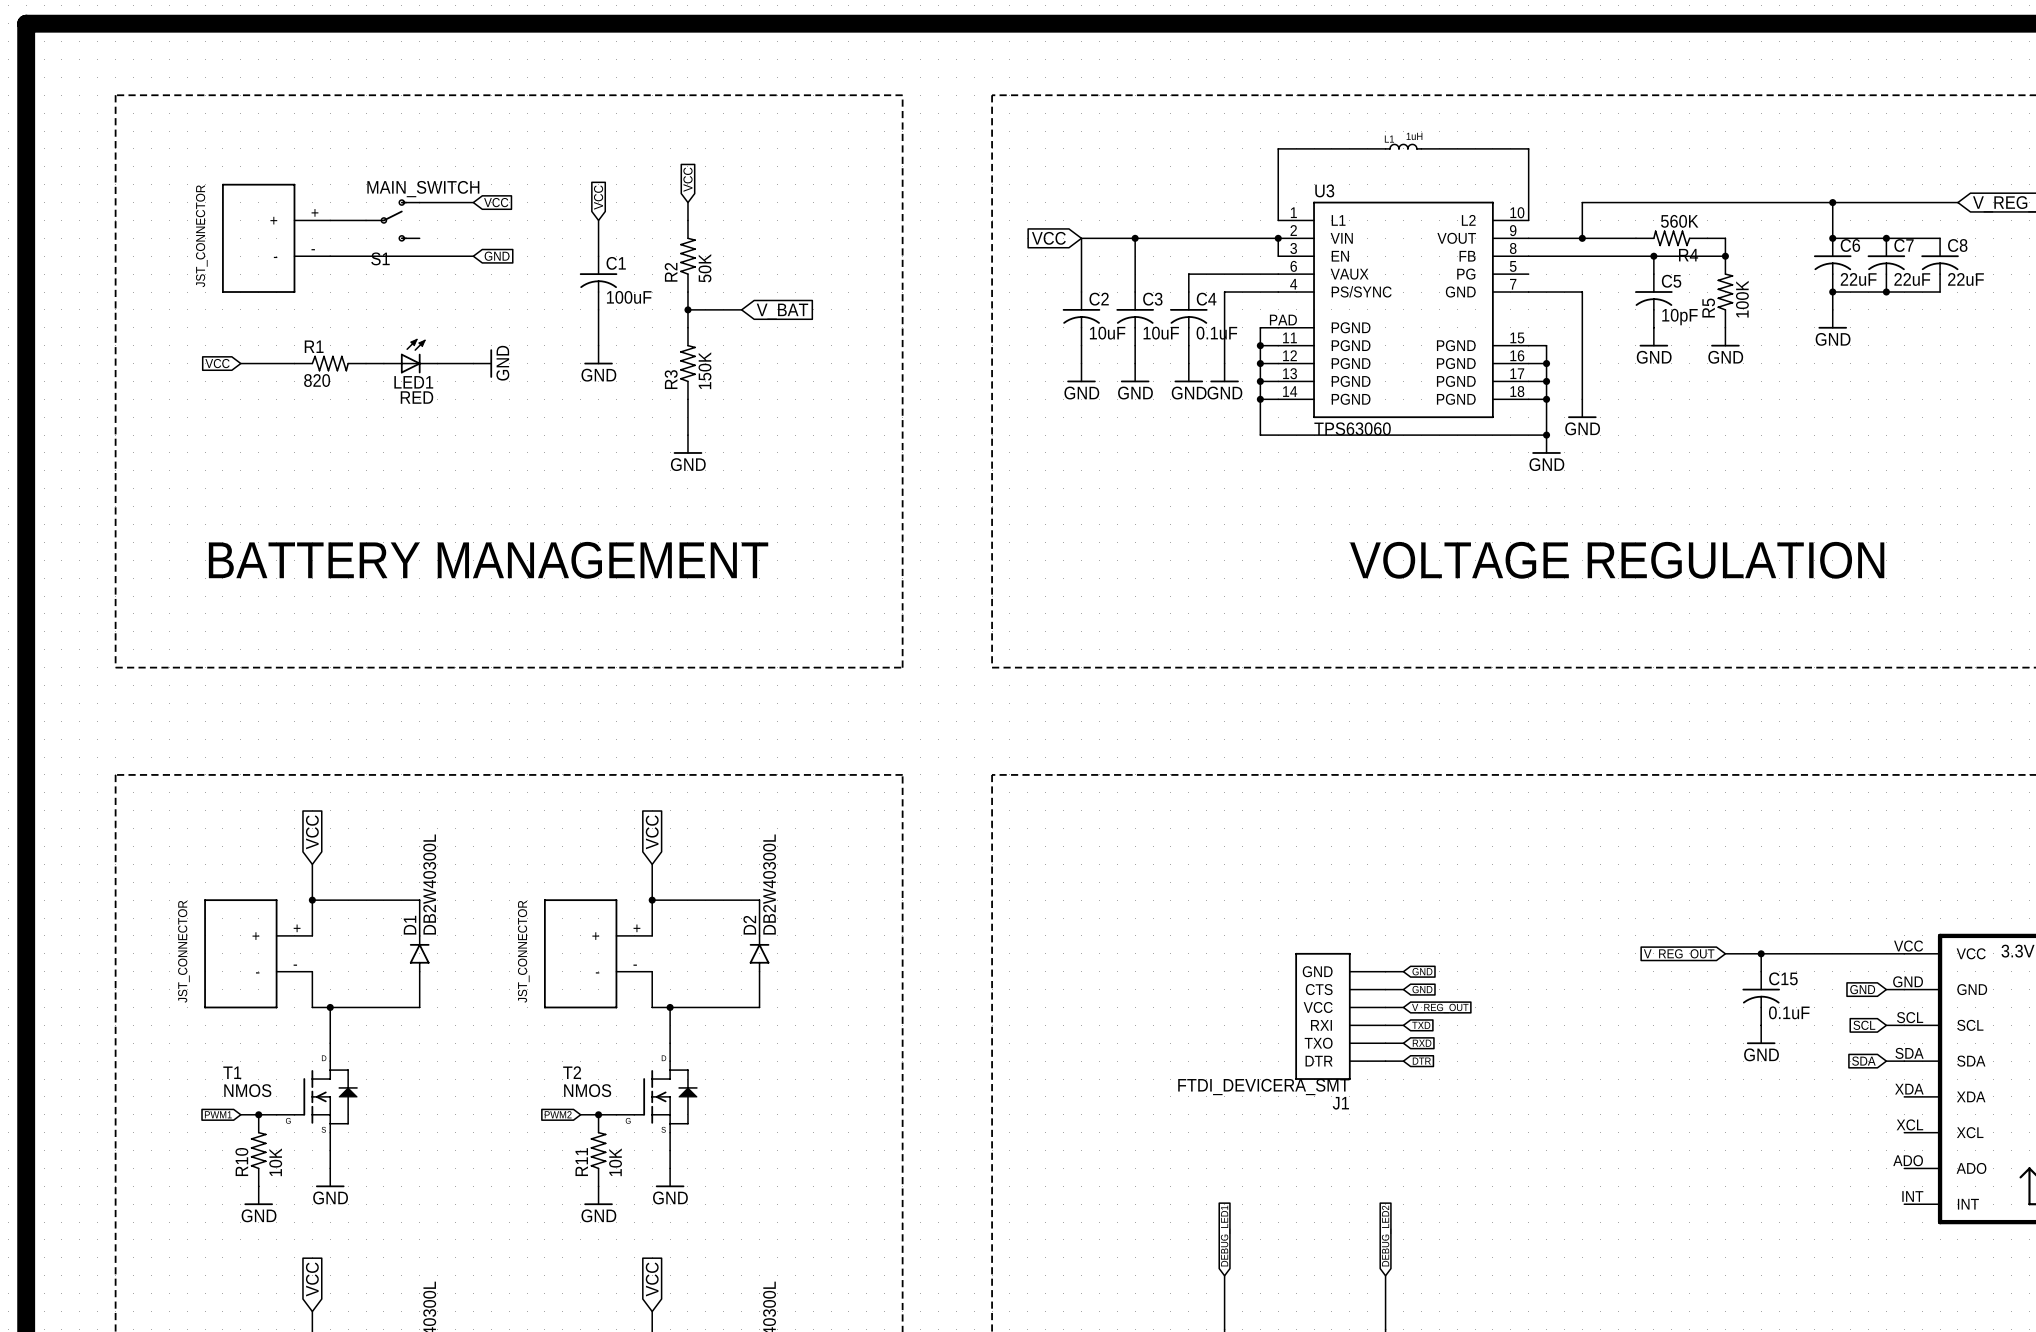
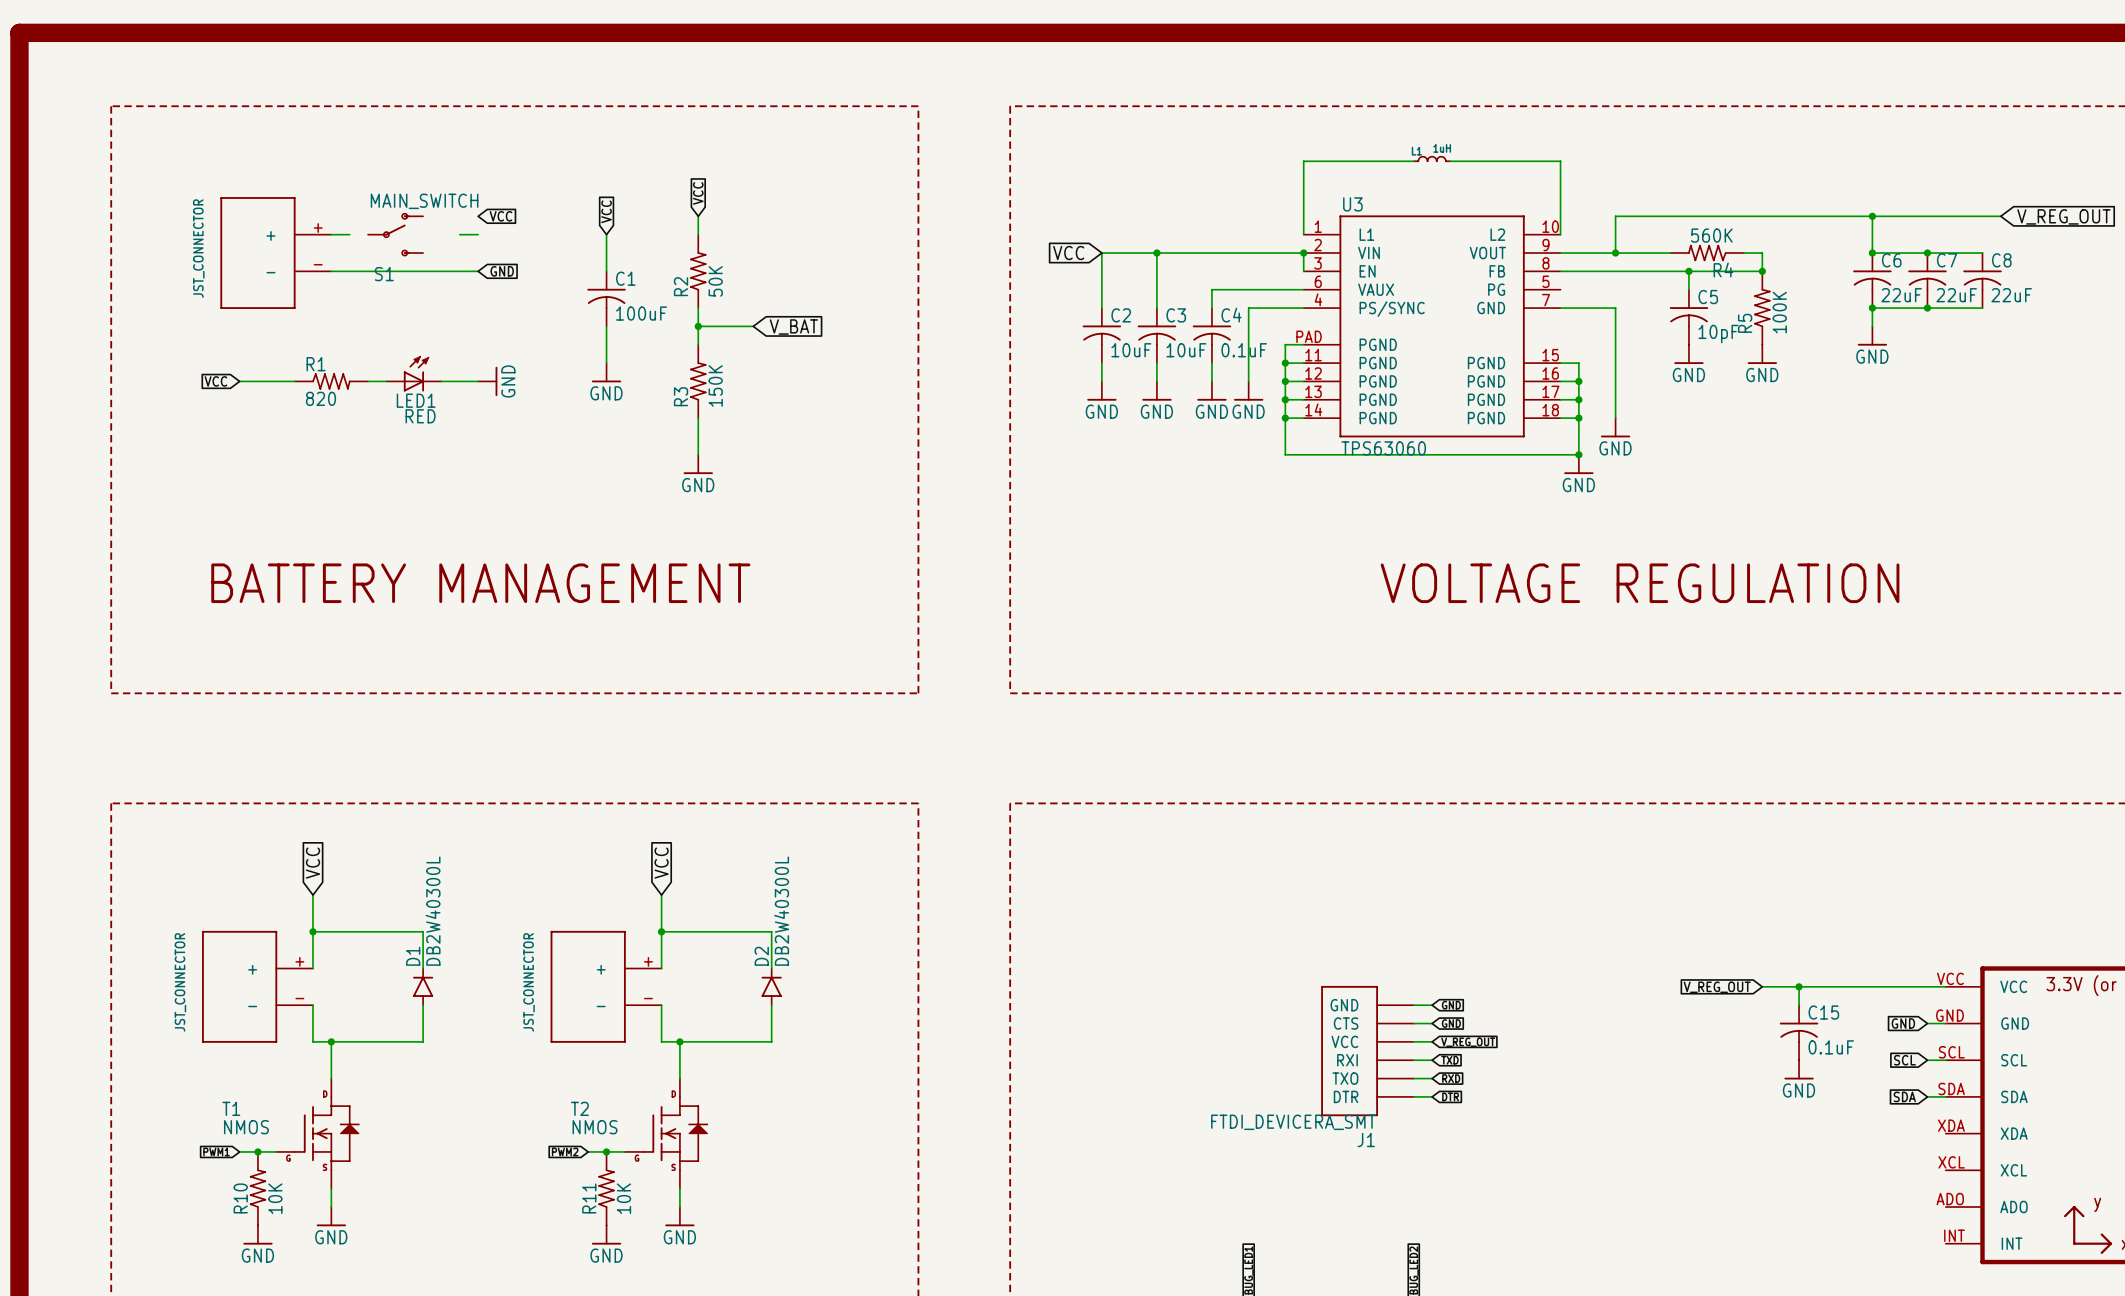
wire: (419, 202) (473, 202) -> none
wire: (348, 220) (366, 220) -> (459, 234) (478, 234)

